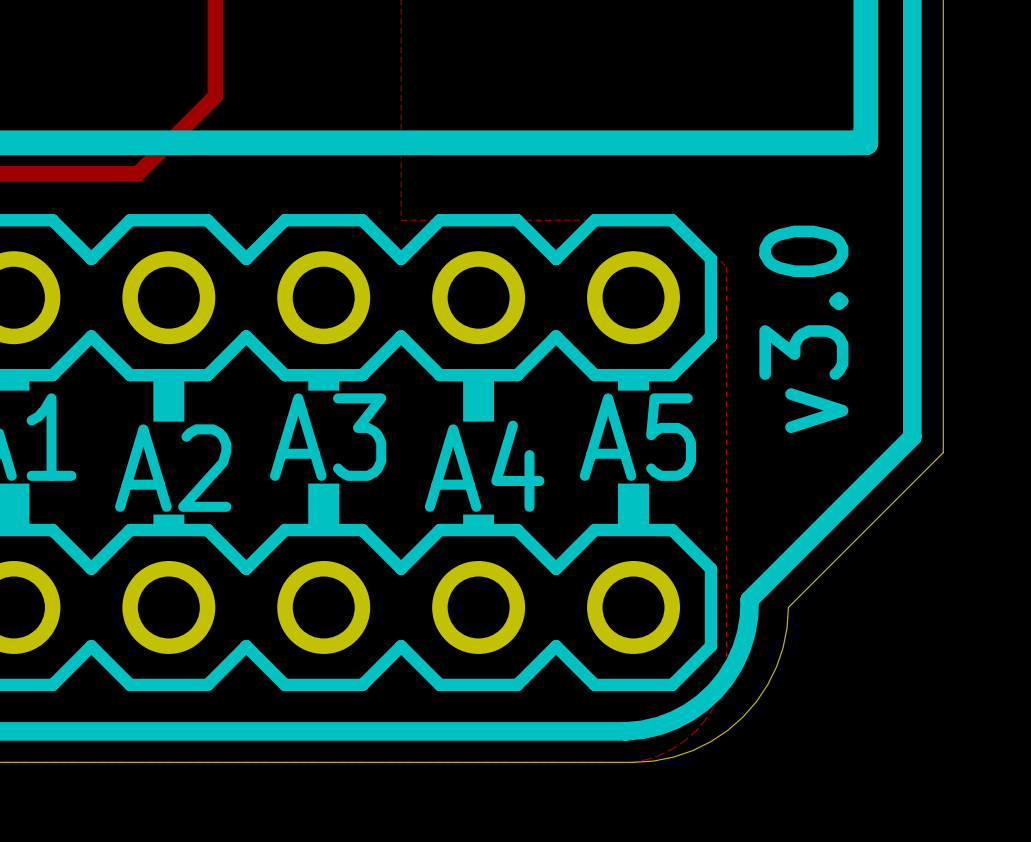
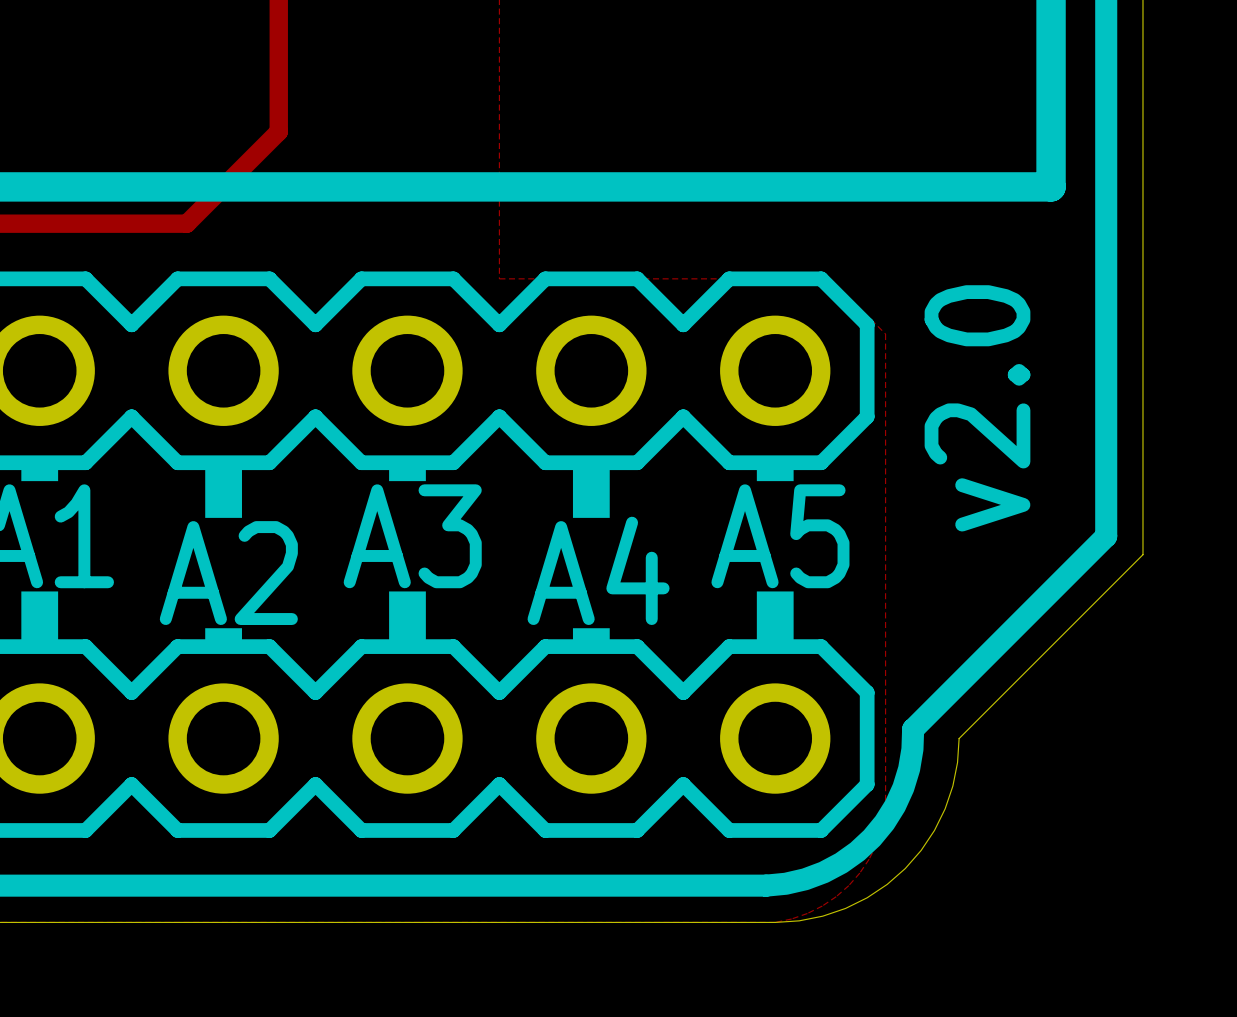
text: v3.0 (803, 329) -> v2.0 (977, 408)

